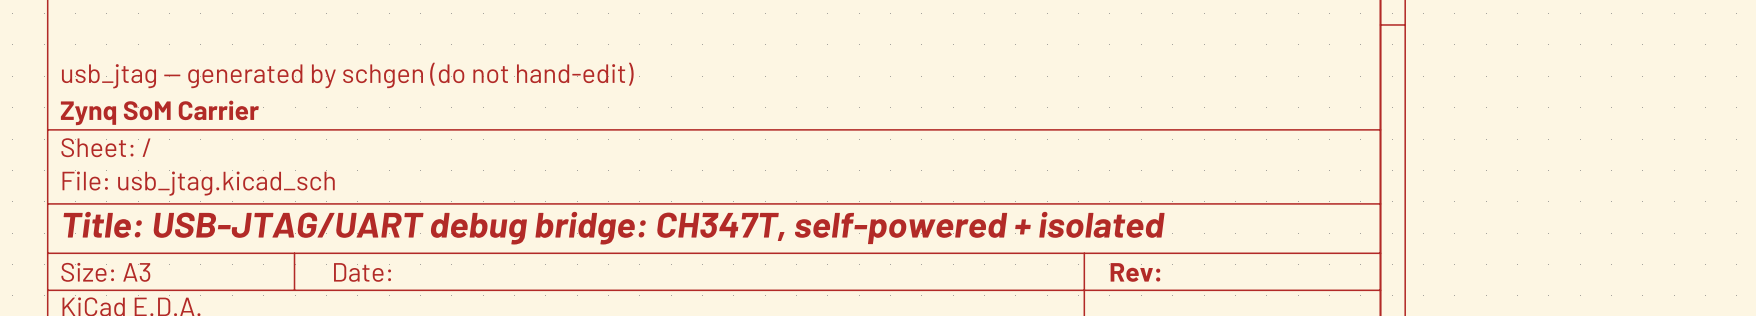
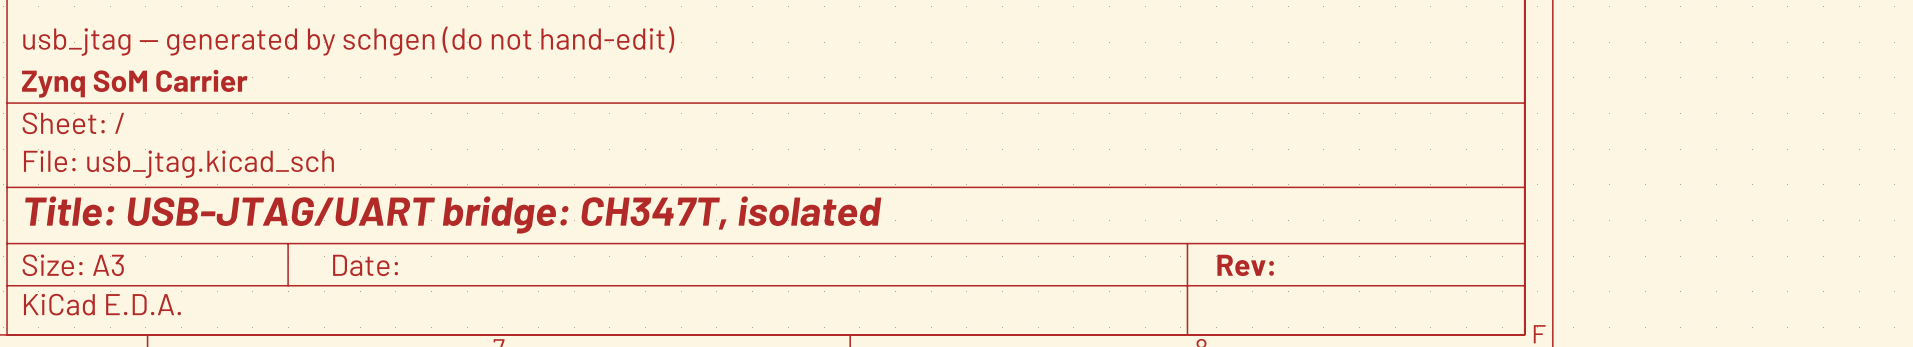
title block: Title: USB-JTAG/UART debug bridge: CH347T, self-powered + isolated (614, 228) -> Title: USB-JTAG/UART bridge: CH347T, isolated (453, 214)

